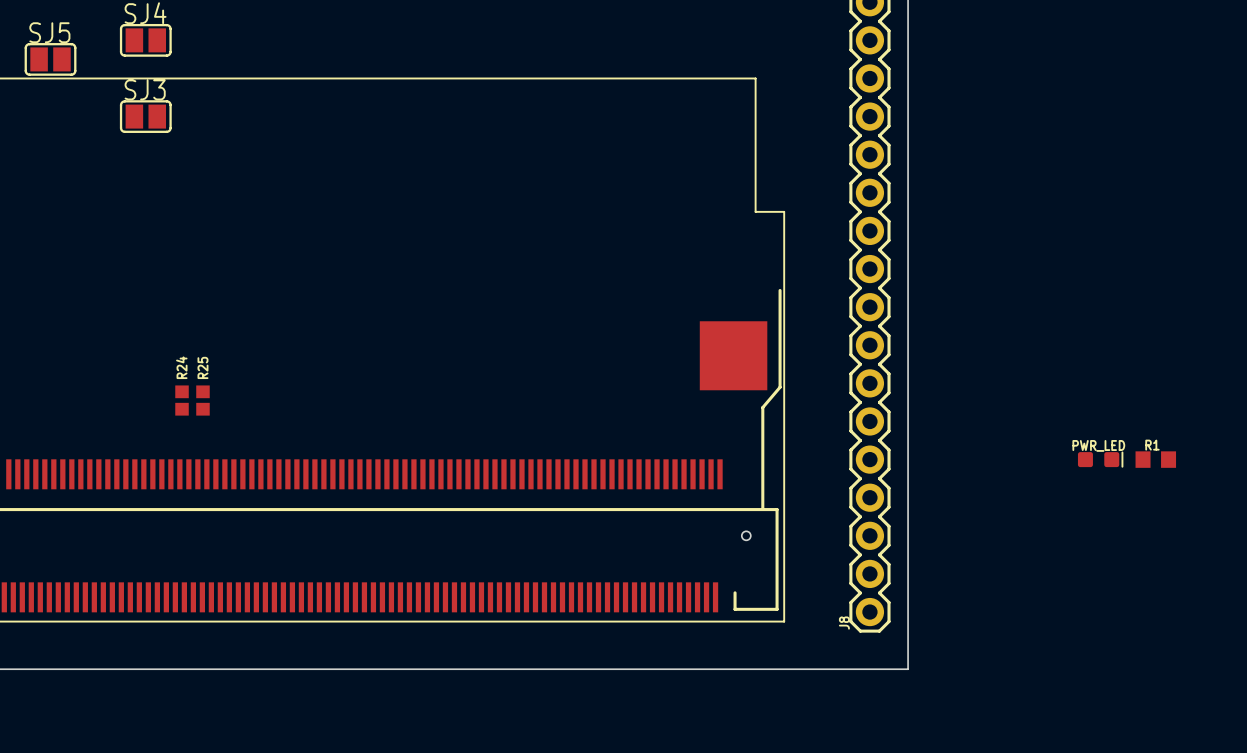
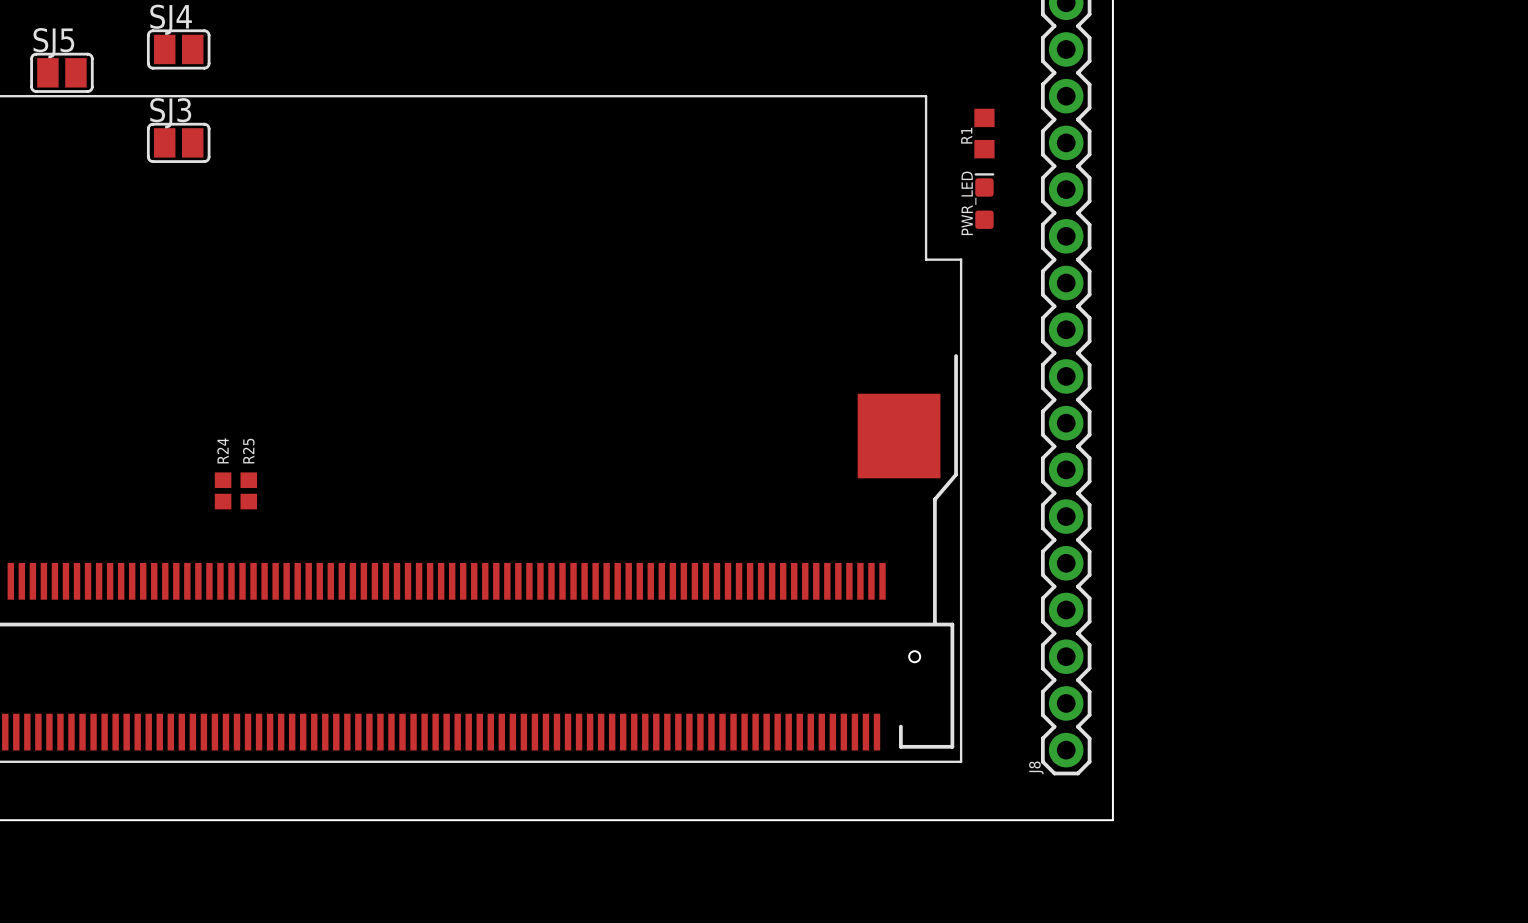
PWR_LED: none -> (984, 201)
PWR_LED: (1100, 459) -> none
R1 rotation: 0° (1155, 459) -> 90° clockwise (984, 133)
R1 position: (1155, 459) -> (984, 133)

